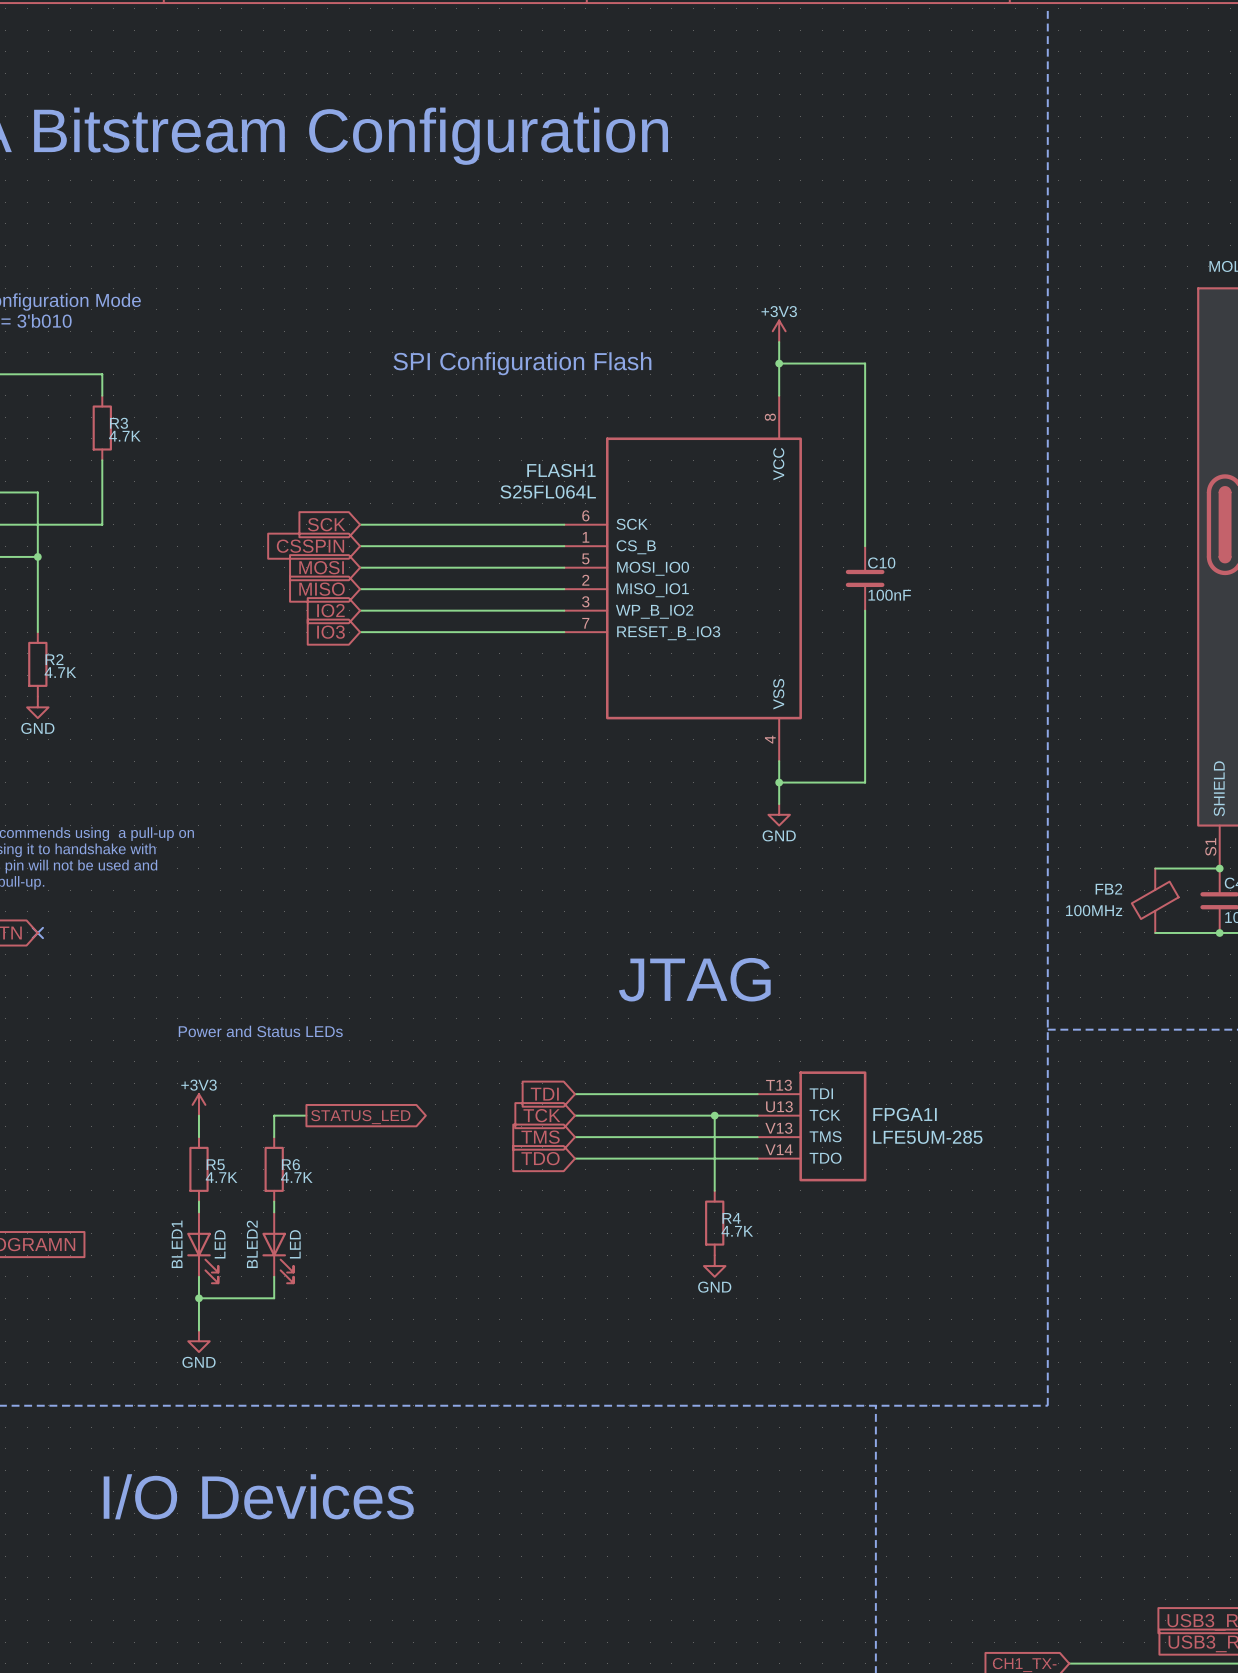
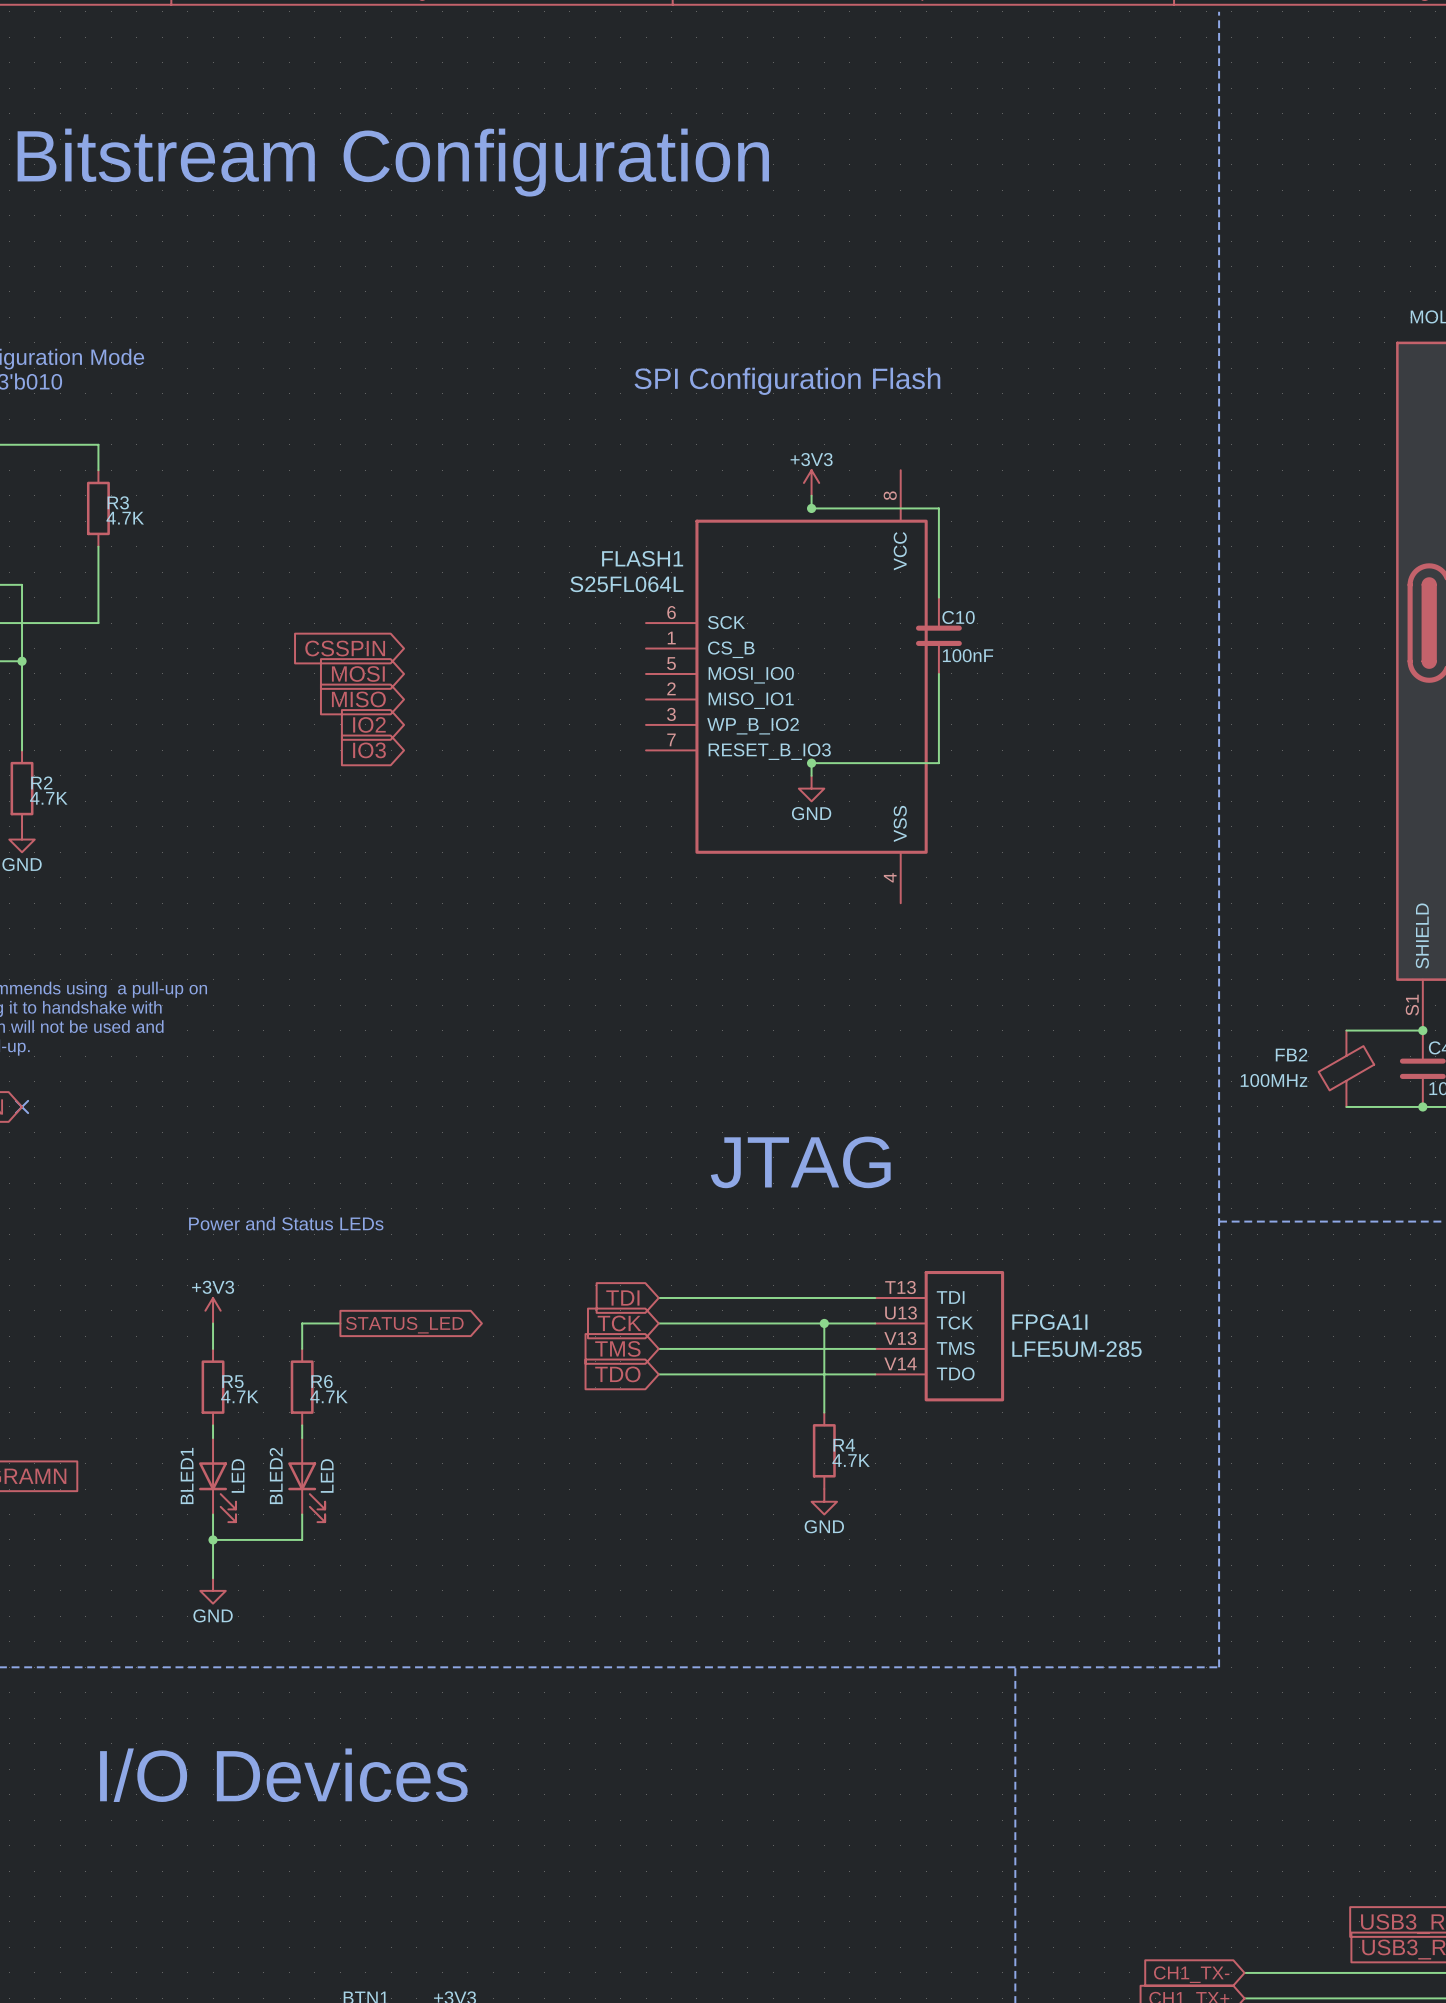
power symbol position: +3V3 (779, 331) -> +3V3 (811, 482)
wire: (779, 342) (779, 395) -> none
text position: SPI Configuration Flash (522, 363) -> SPI Configuration Flash (787, 381)
wire: (779, 363) (865, 363) (865, 546) -> none
junction: (779, 363) -> none
wire: none -> (811, 495) (811, 508) (938, 508) (938, 597)
junction: none -> (811, 508)
global label: SCK (326, 524) -> none
wire: (360, 524) (564, 524) -> none
wire: (360, 546) (564, 546) -> none
wire: (360, 567) (564, 567) -> none
wire: none -> (938, 673) (938, 763) (811, 763) (811, 775)
C10 position: (865, 578) -> (938, 635)
wire: (360, 589) (564, 589) -> none
wire: (360, 610) (564, 610) -> none
wire: (865, 610) (865, 782) (779, 782) -> none
wire: (360, 632) (564, 632) -> none
junction: none -> (811, 763)
wire: (779, 761) (779, 804) -> none
junction: (779, 782) -> none
power symbol position: GND (779, 814) -> GND (811, 788)

